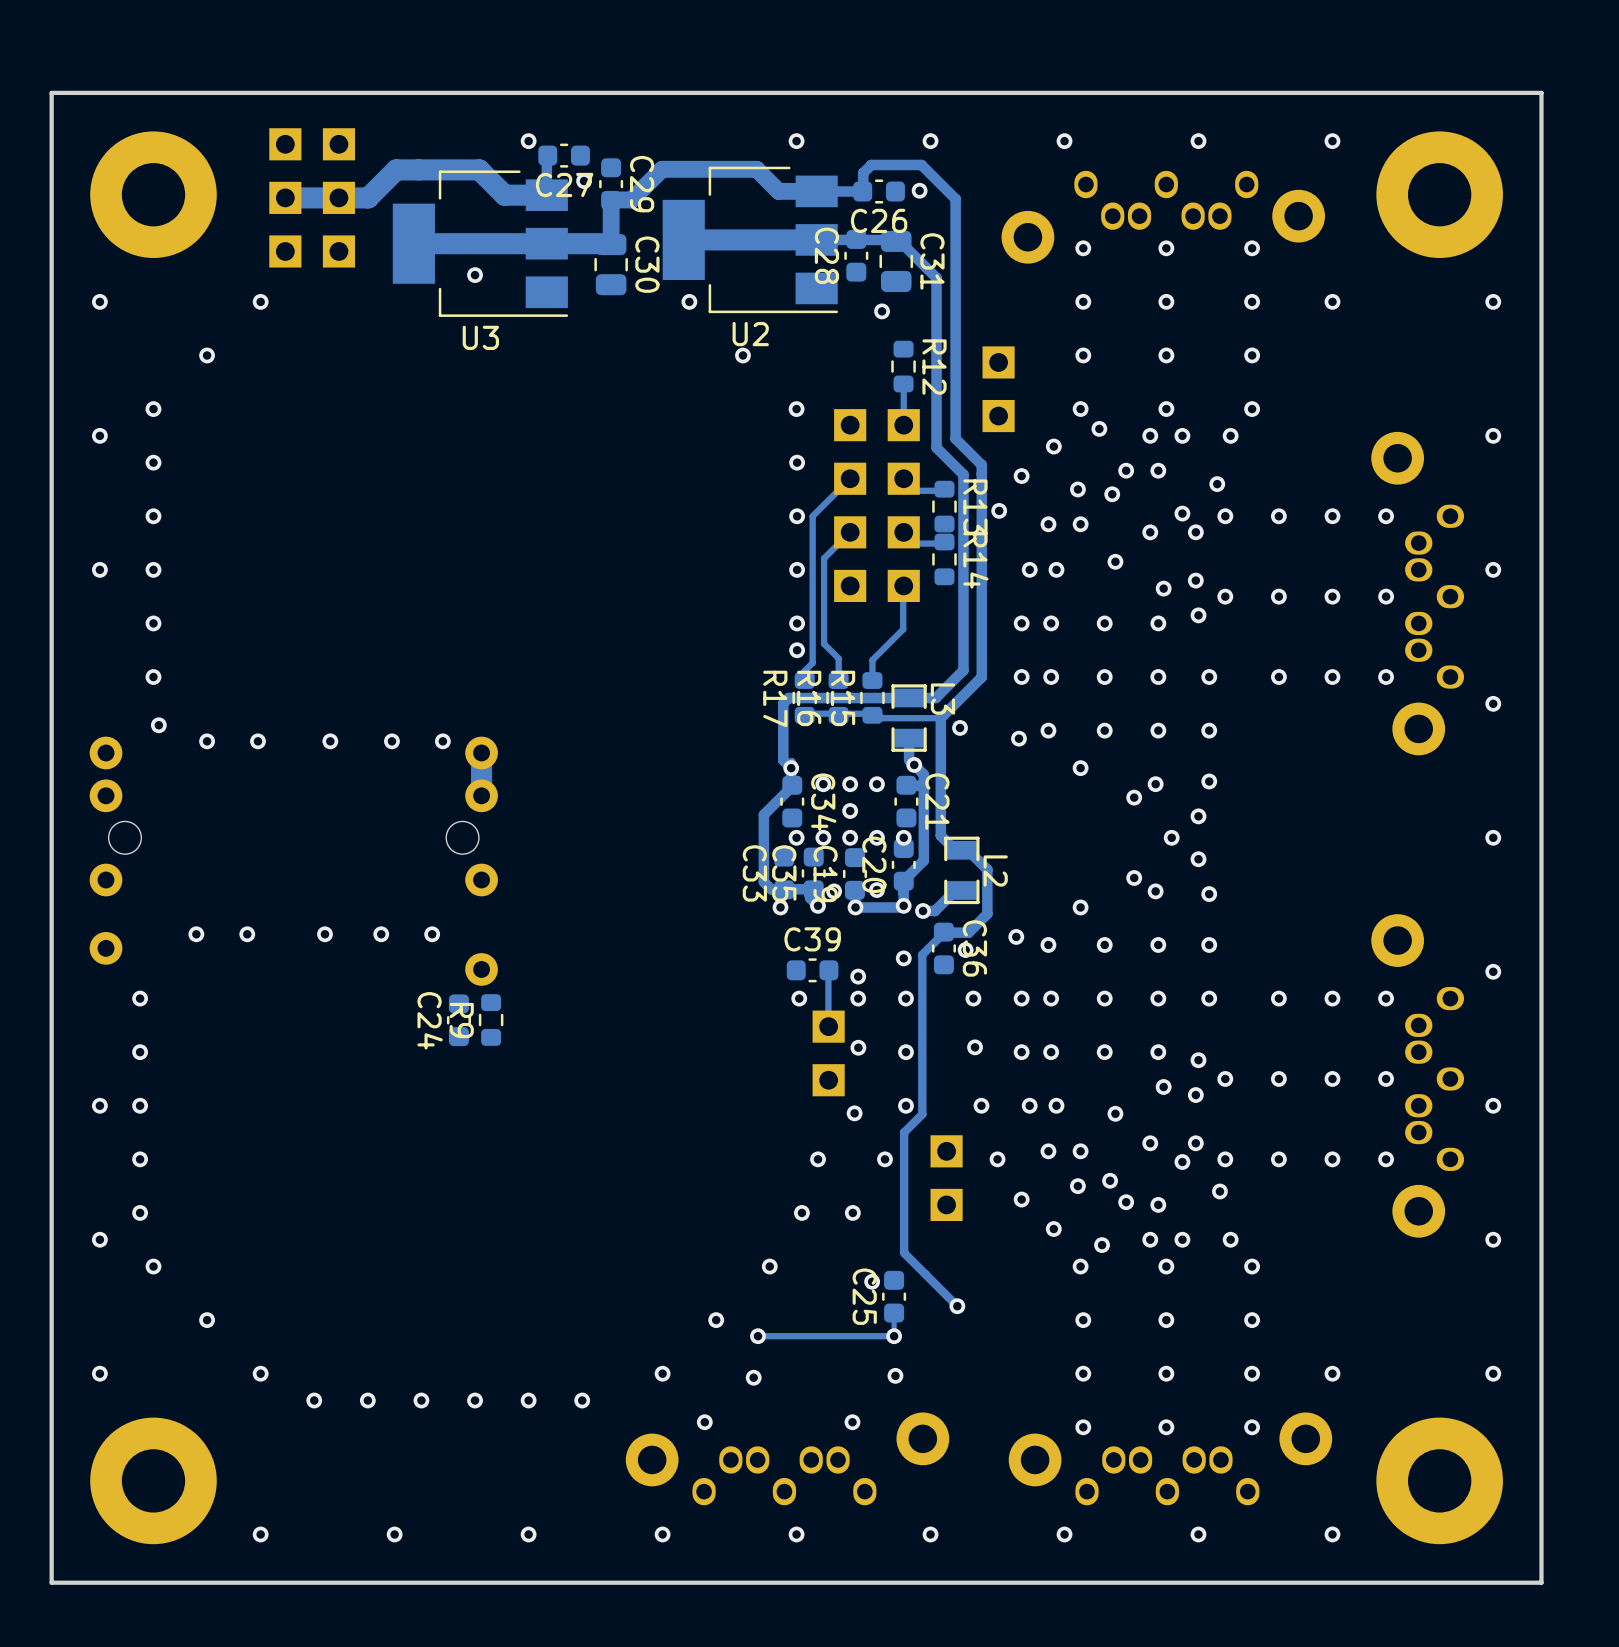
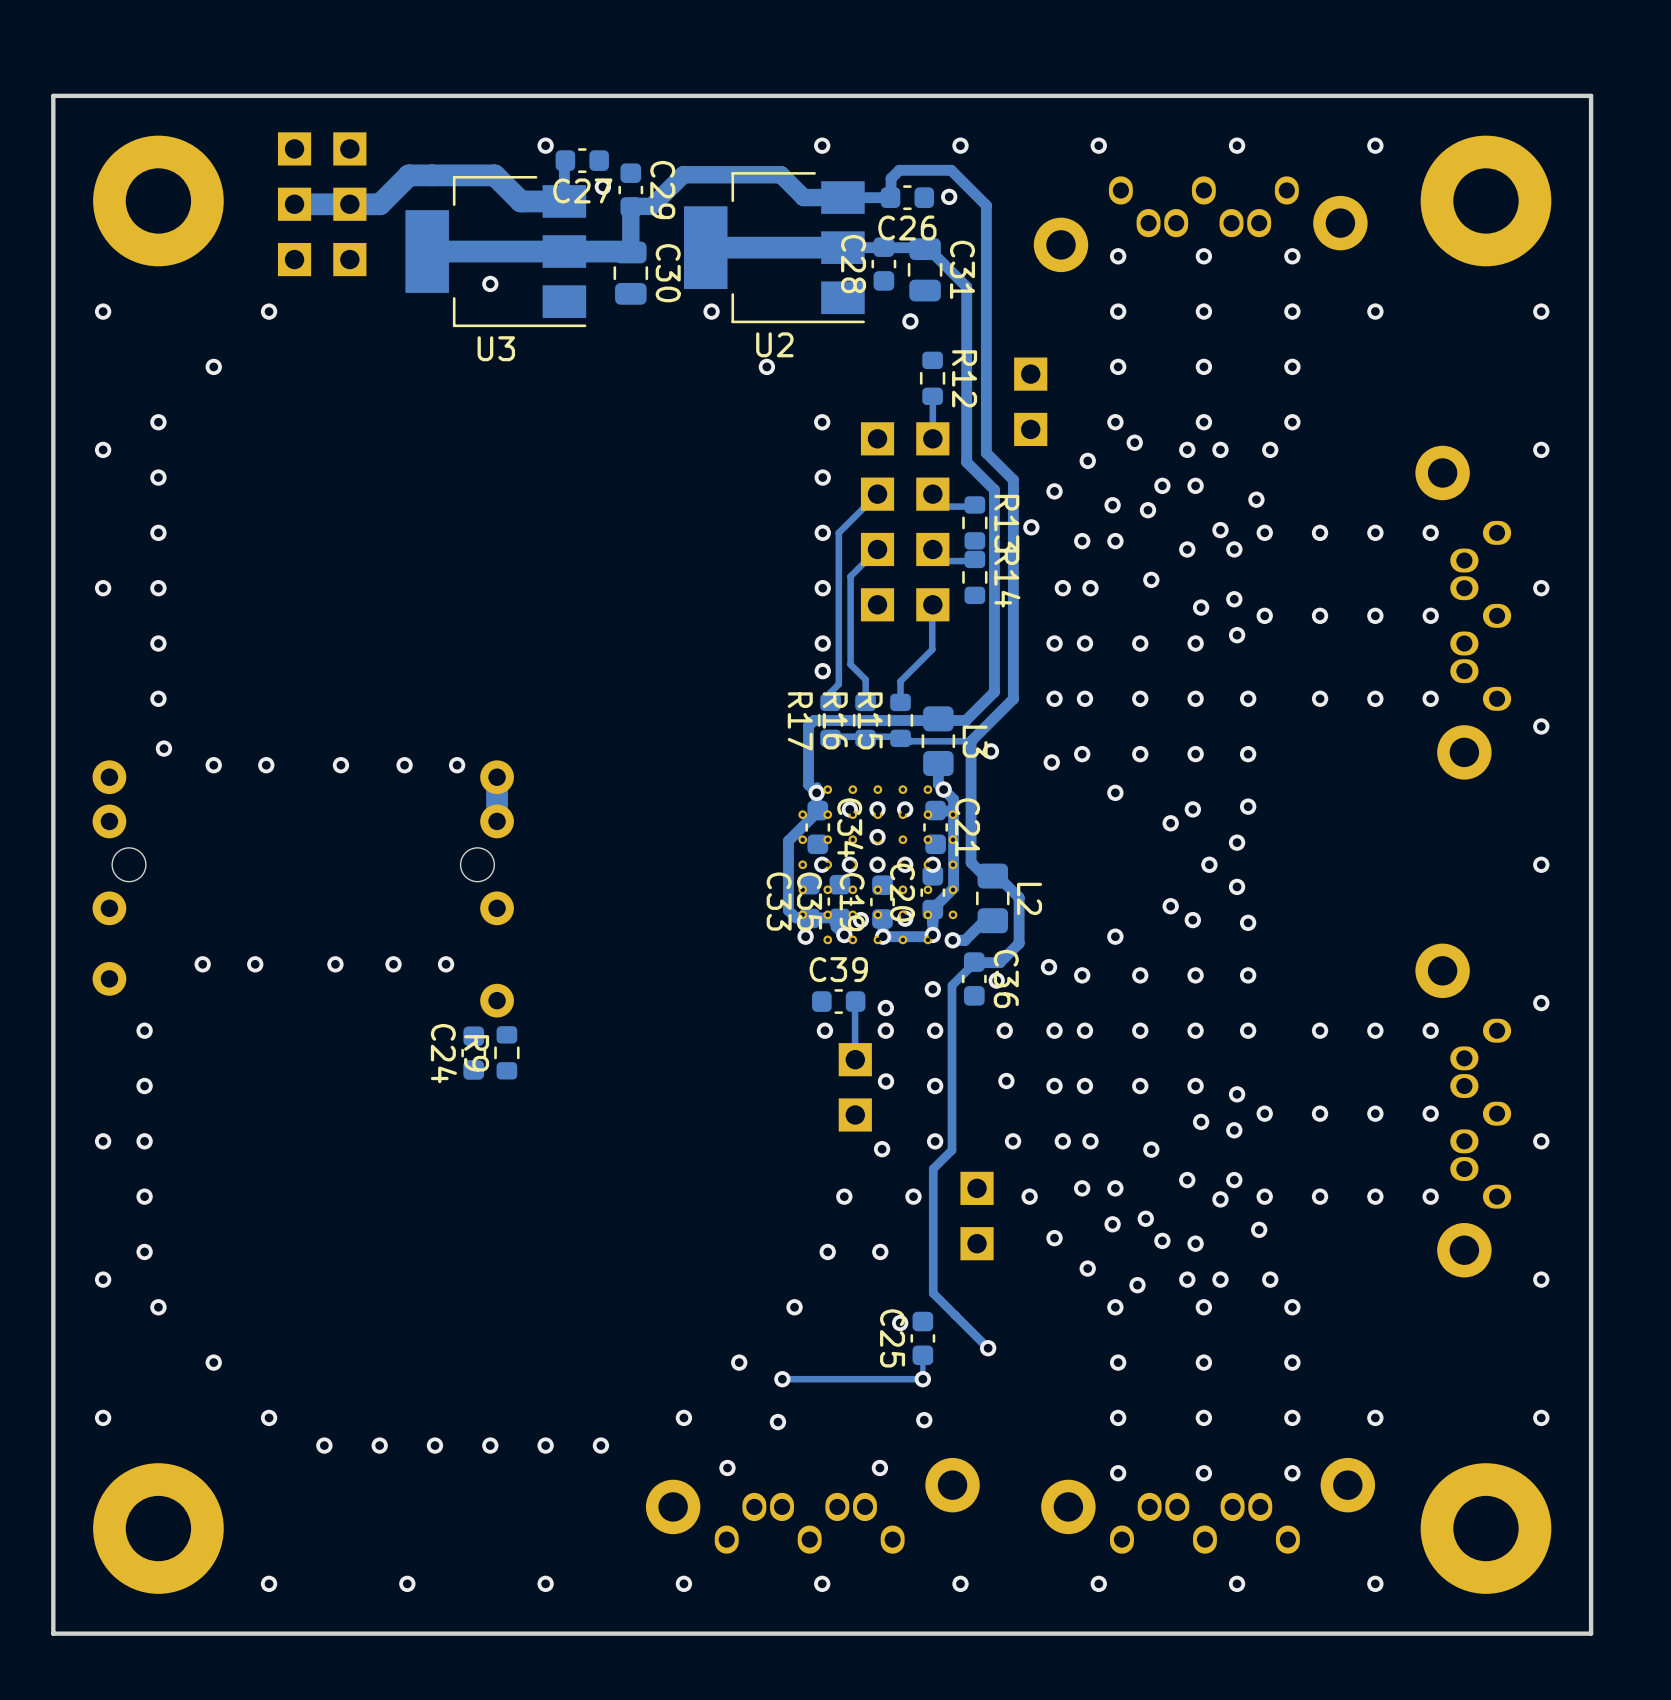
L3 footprint: [891, 684, 927, 752] -> [921, 706, 956, 777]
L2 footprint: [944, 836, 980, 905] -> [976, 863, 1010, 934]
part: none -> (877, 864)

